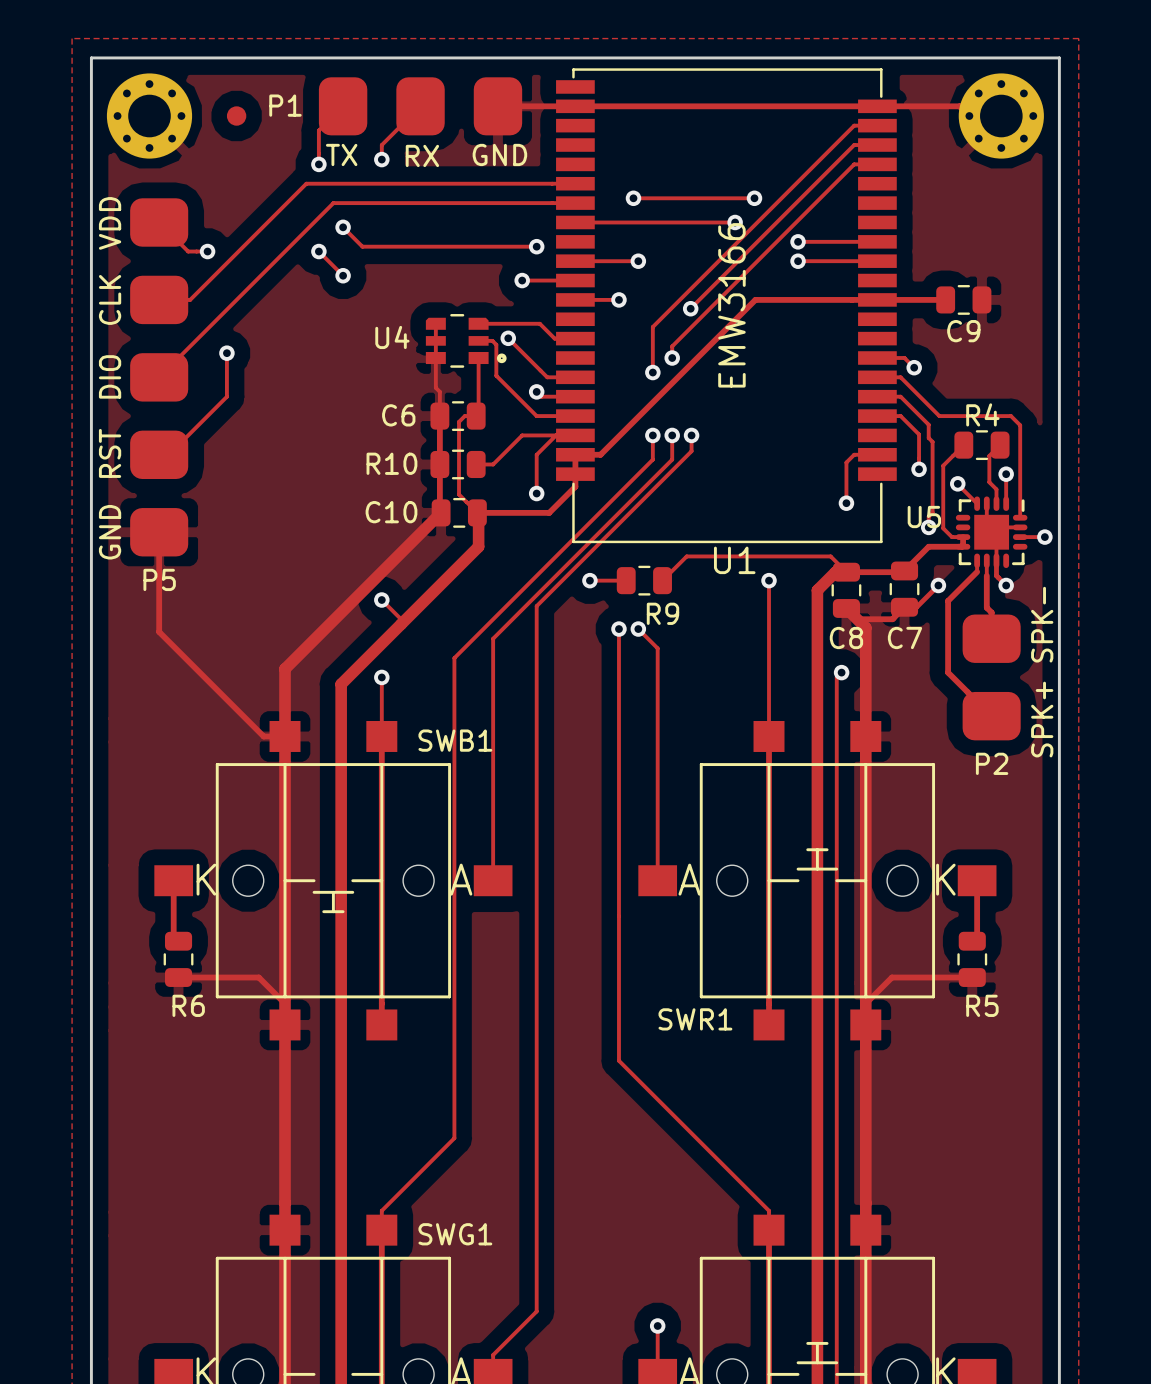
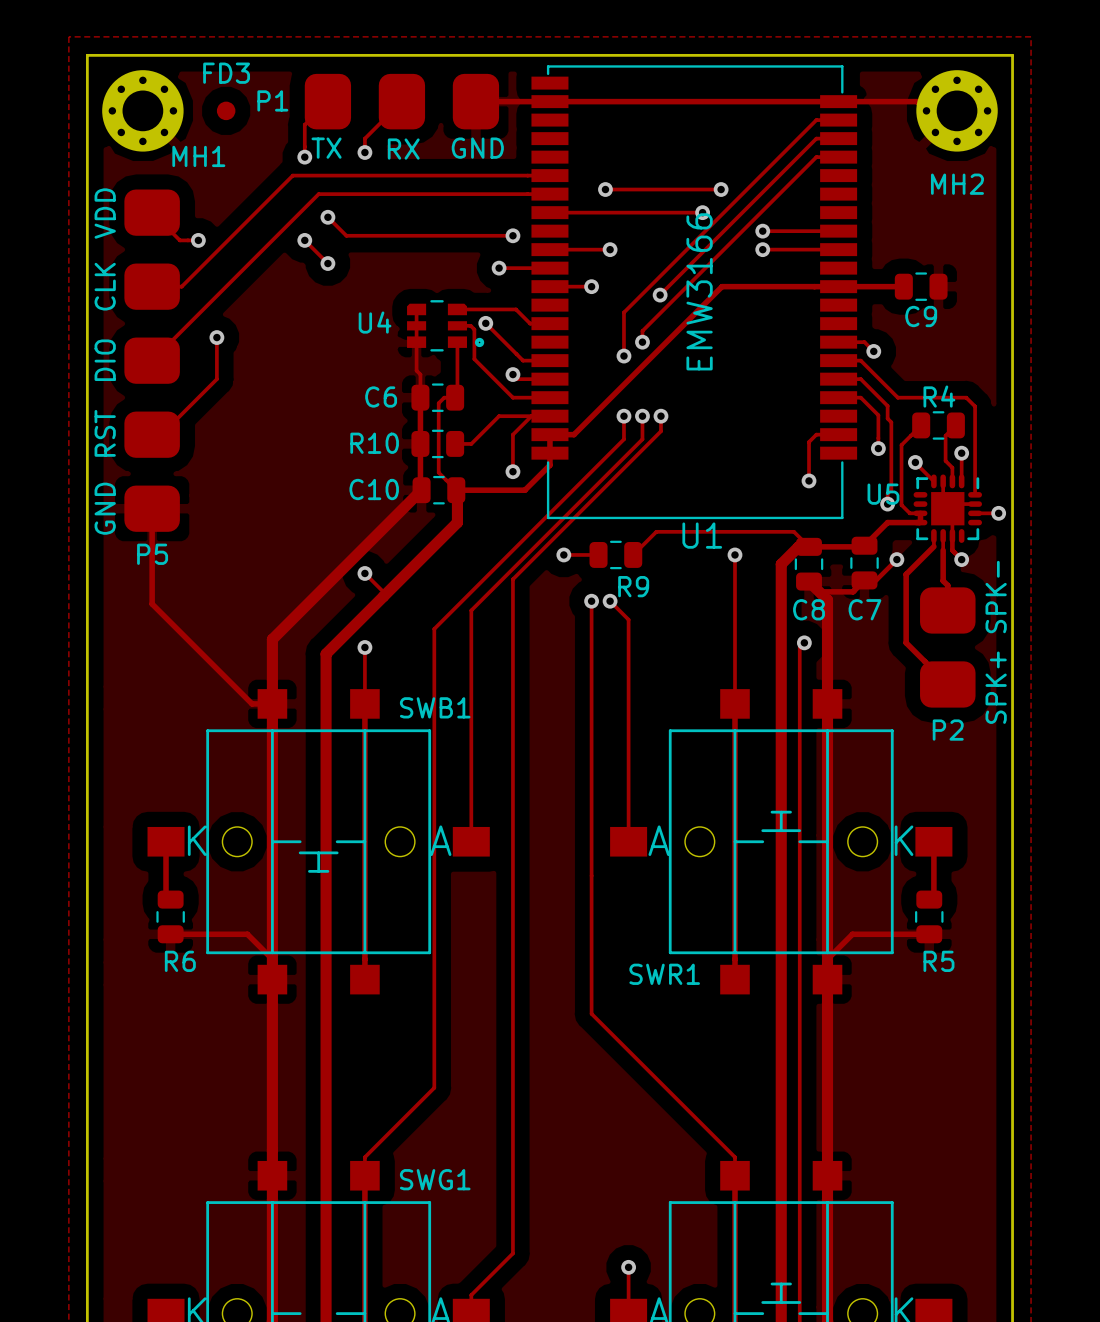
FD3 name: none -> FD3 (226, 73)
MH1 name: none -> MH1 (198, 156)
MH2 name: none -> MH2 (957, 184)

